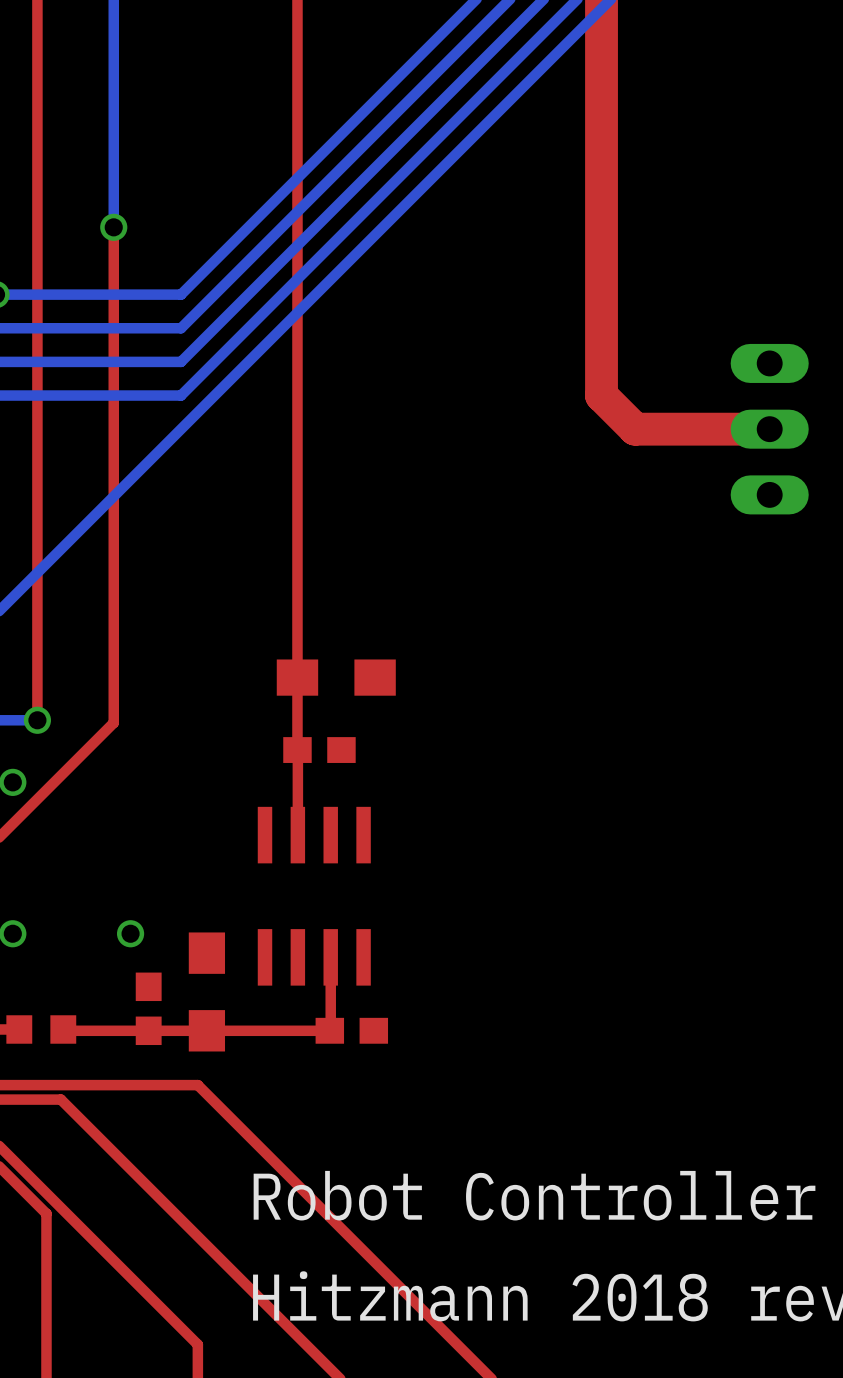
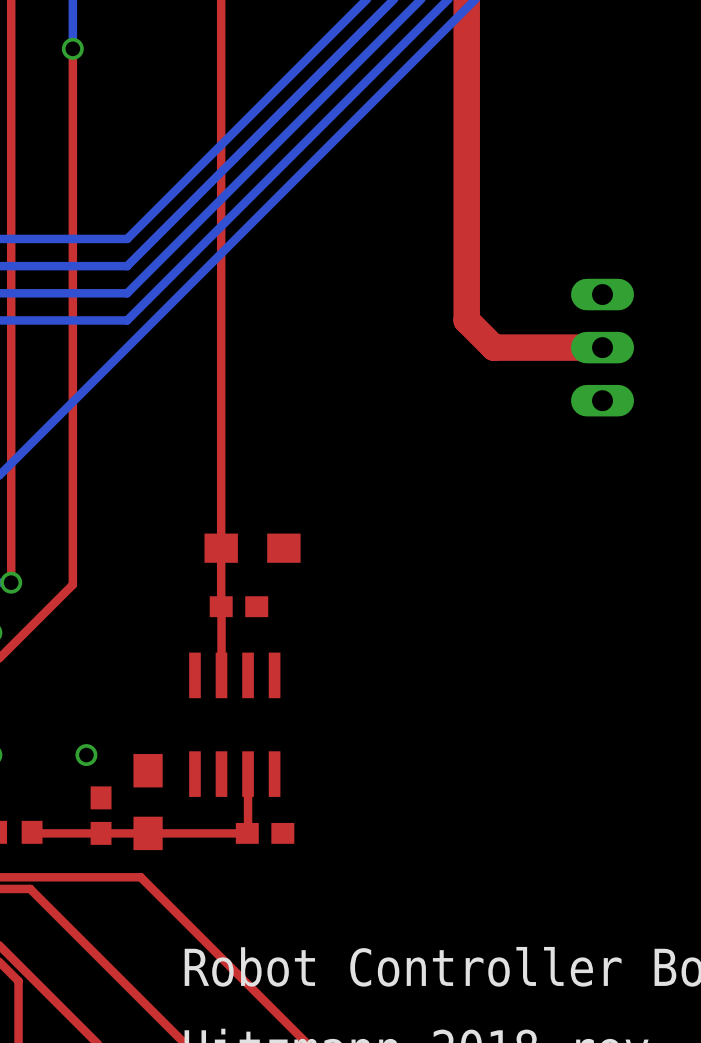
bottom track: (113, 59) (113, 227) -> none
top track: none -> (72, 48) (72, 184)
via: none -> (72, 48)
via: (113, 227) -> none

